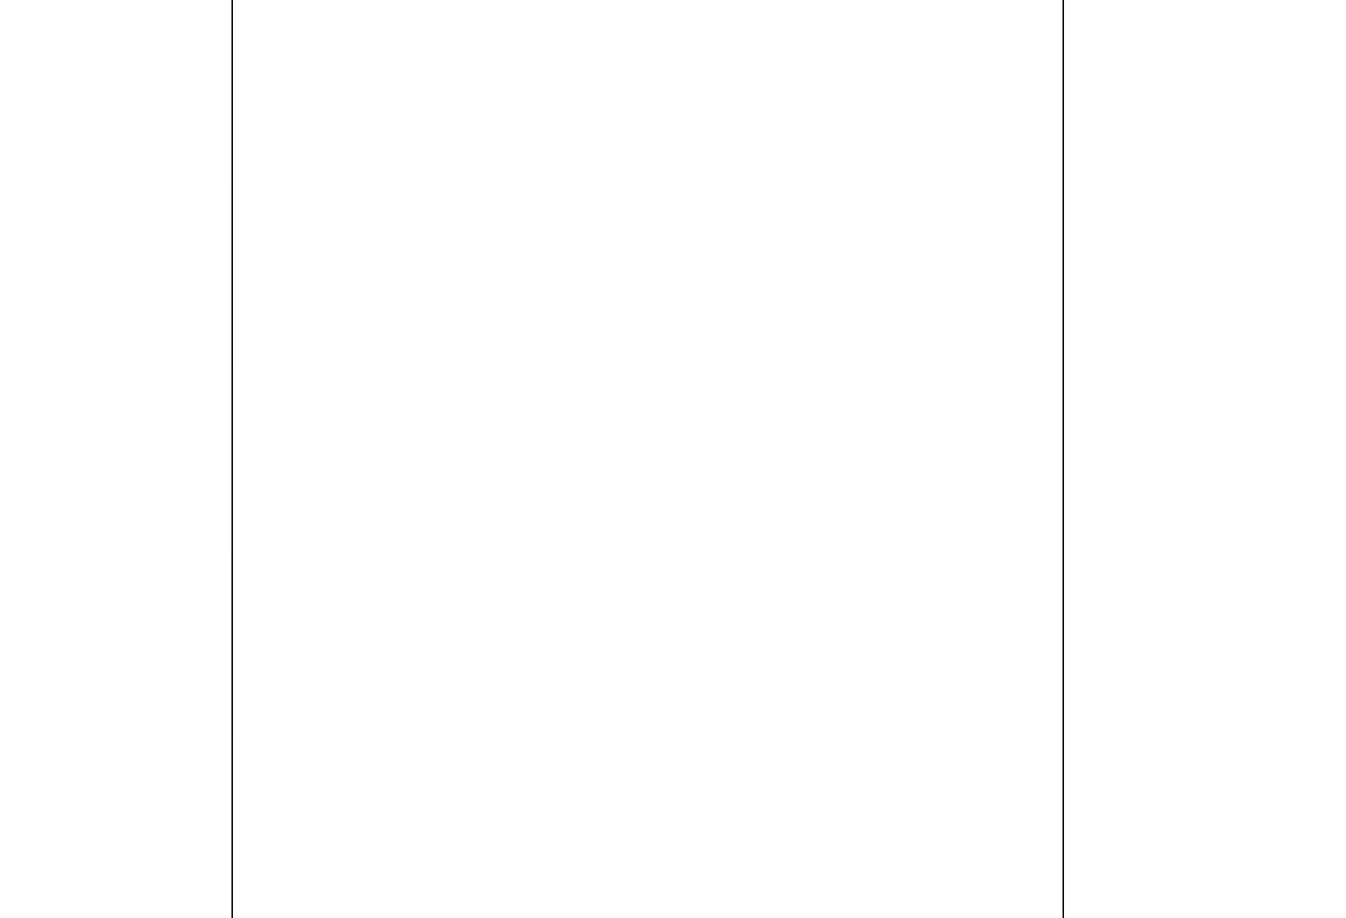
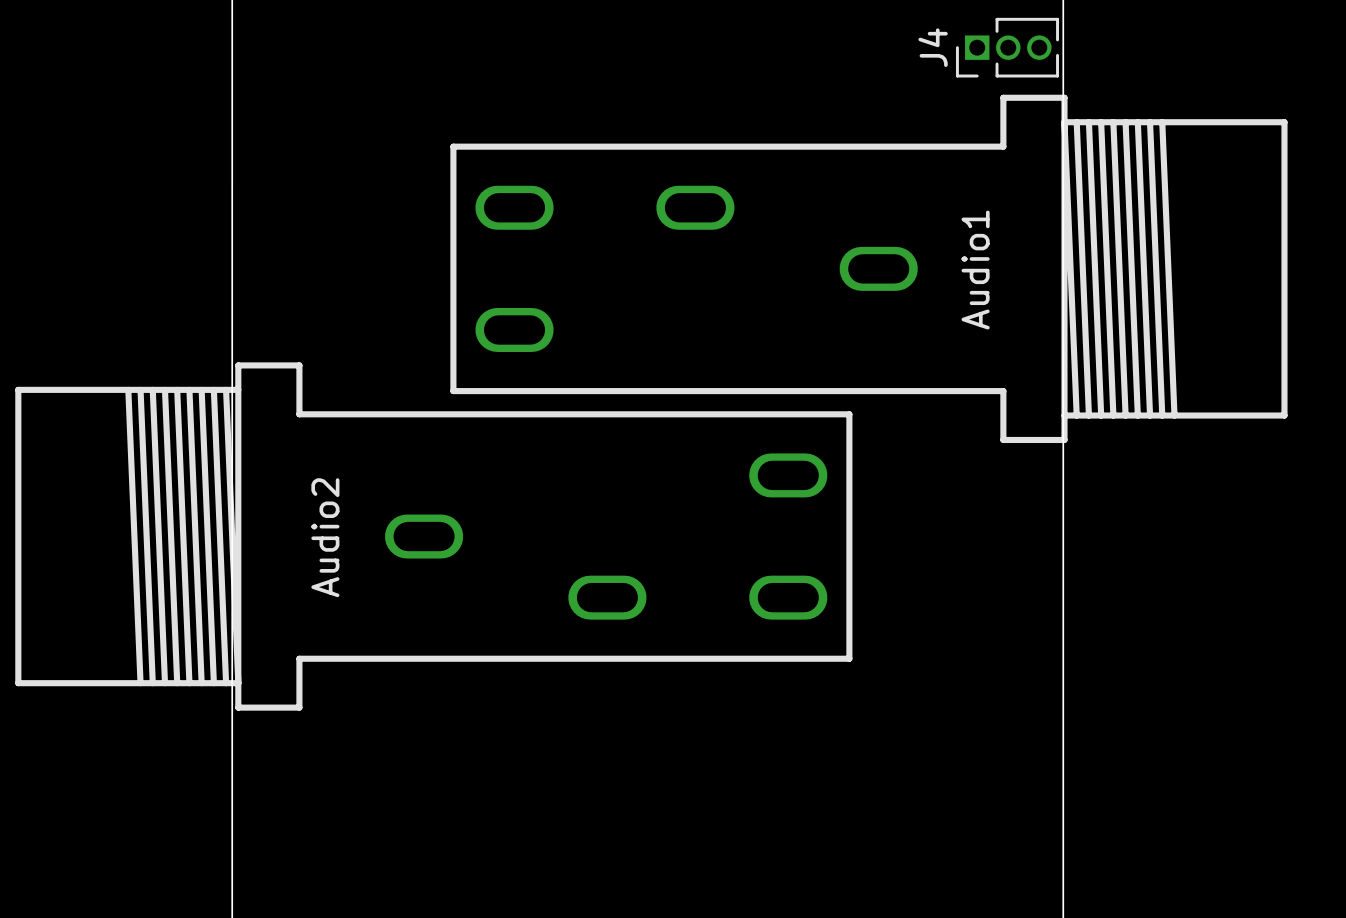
J4: none -> (1007, 47)
Audio1: none -> (868, 268)
Audio2: none -> (433, 536)

